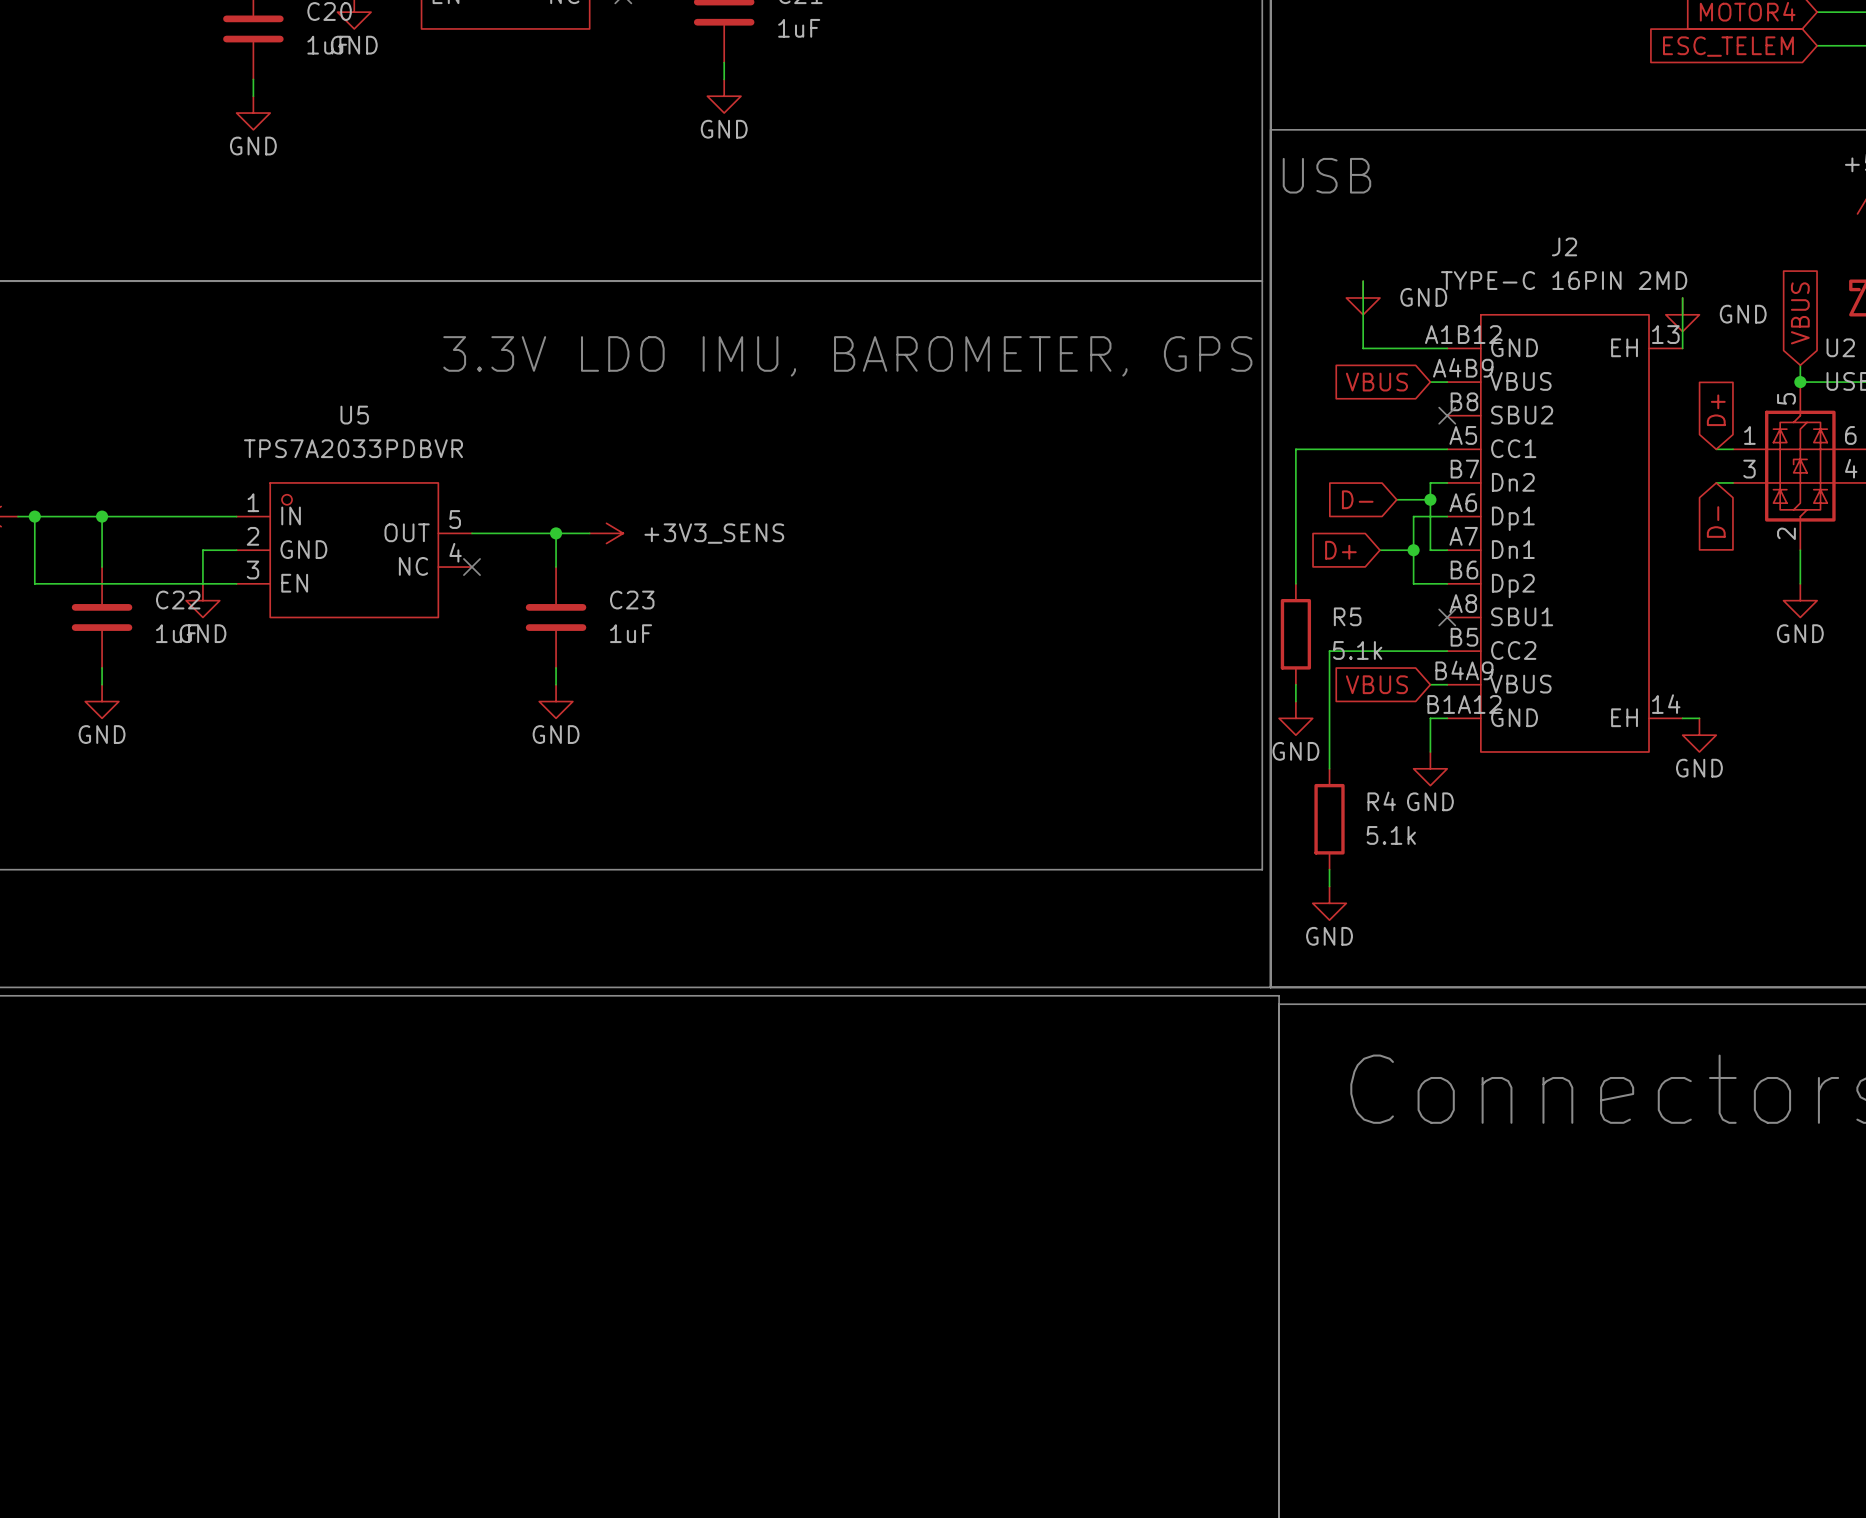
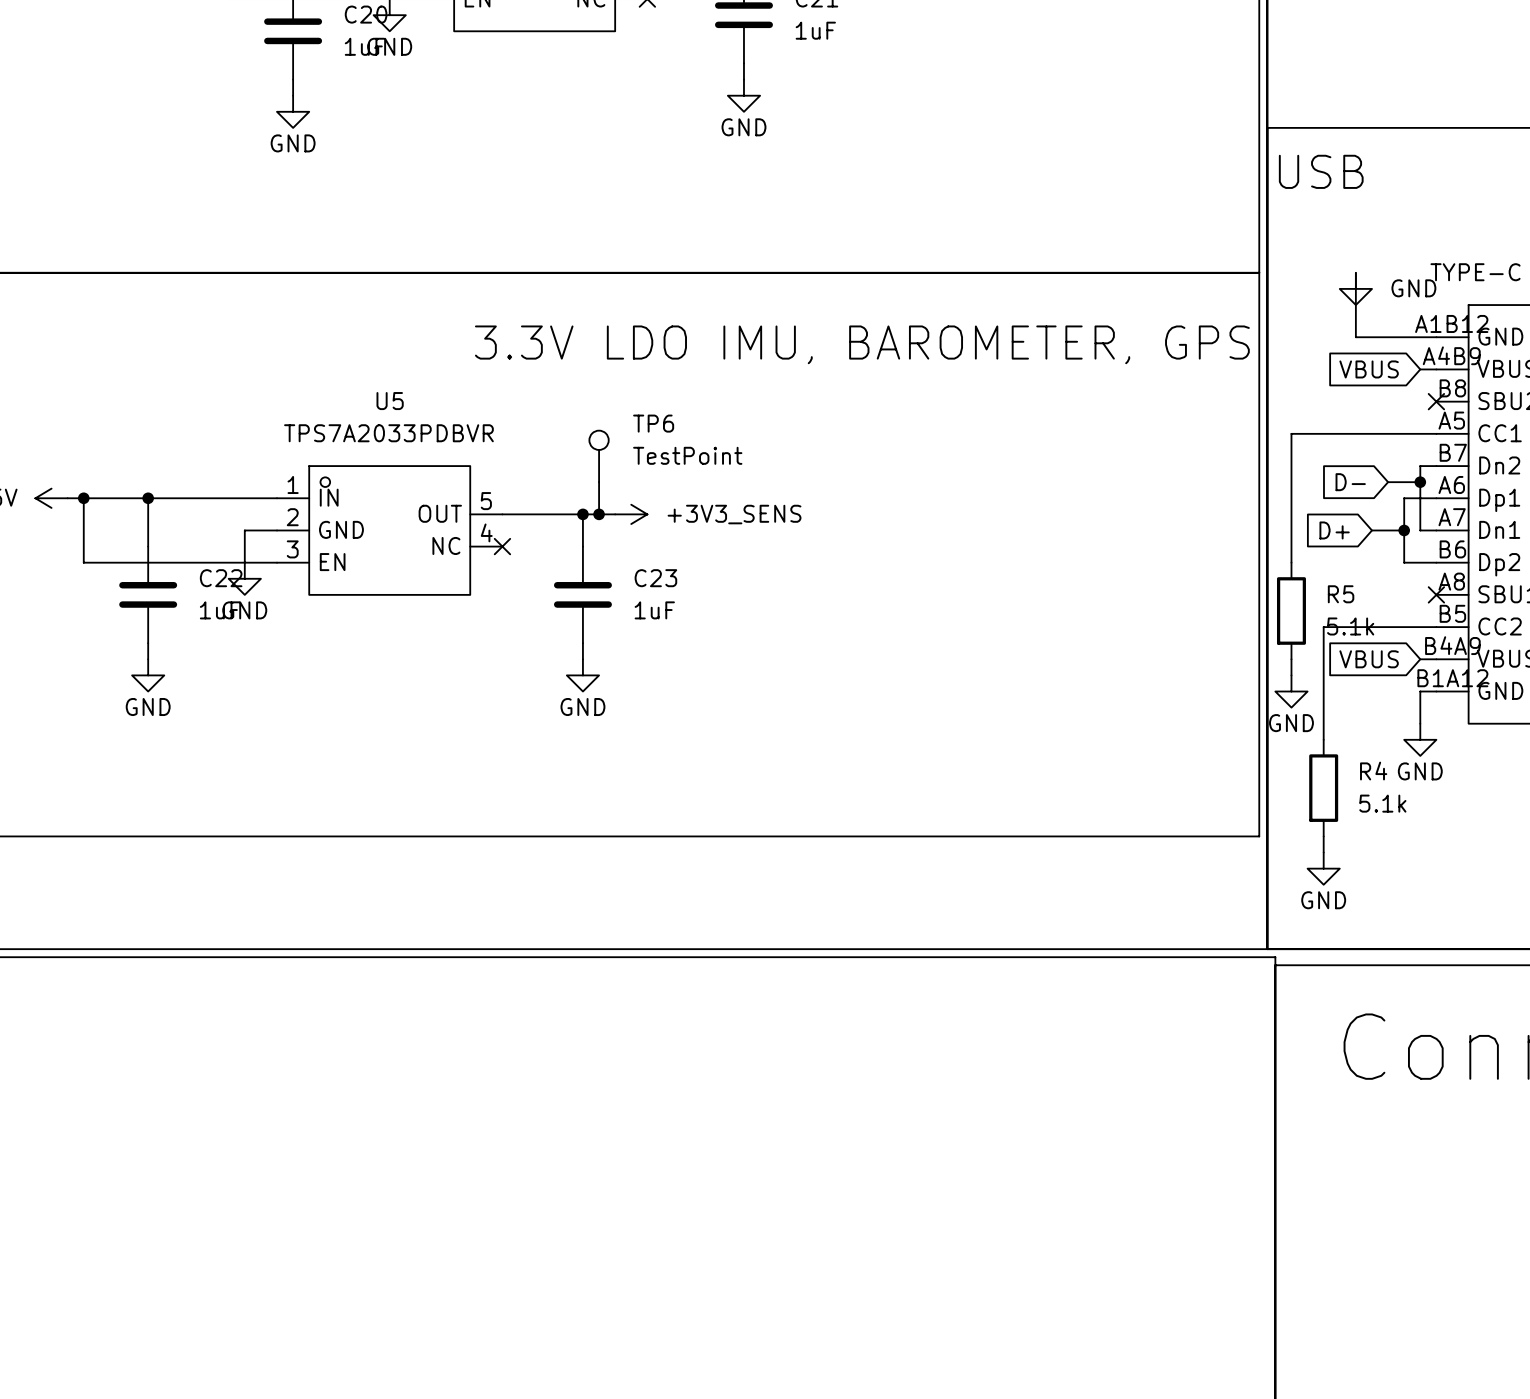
TP6: none -> TestPoint (599, 456)
wire: none -> (599, 482) (599, 514)
junction: none -> (599, 514)

